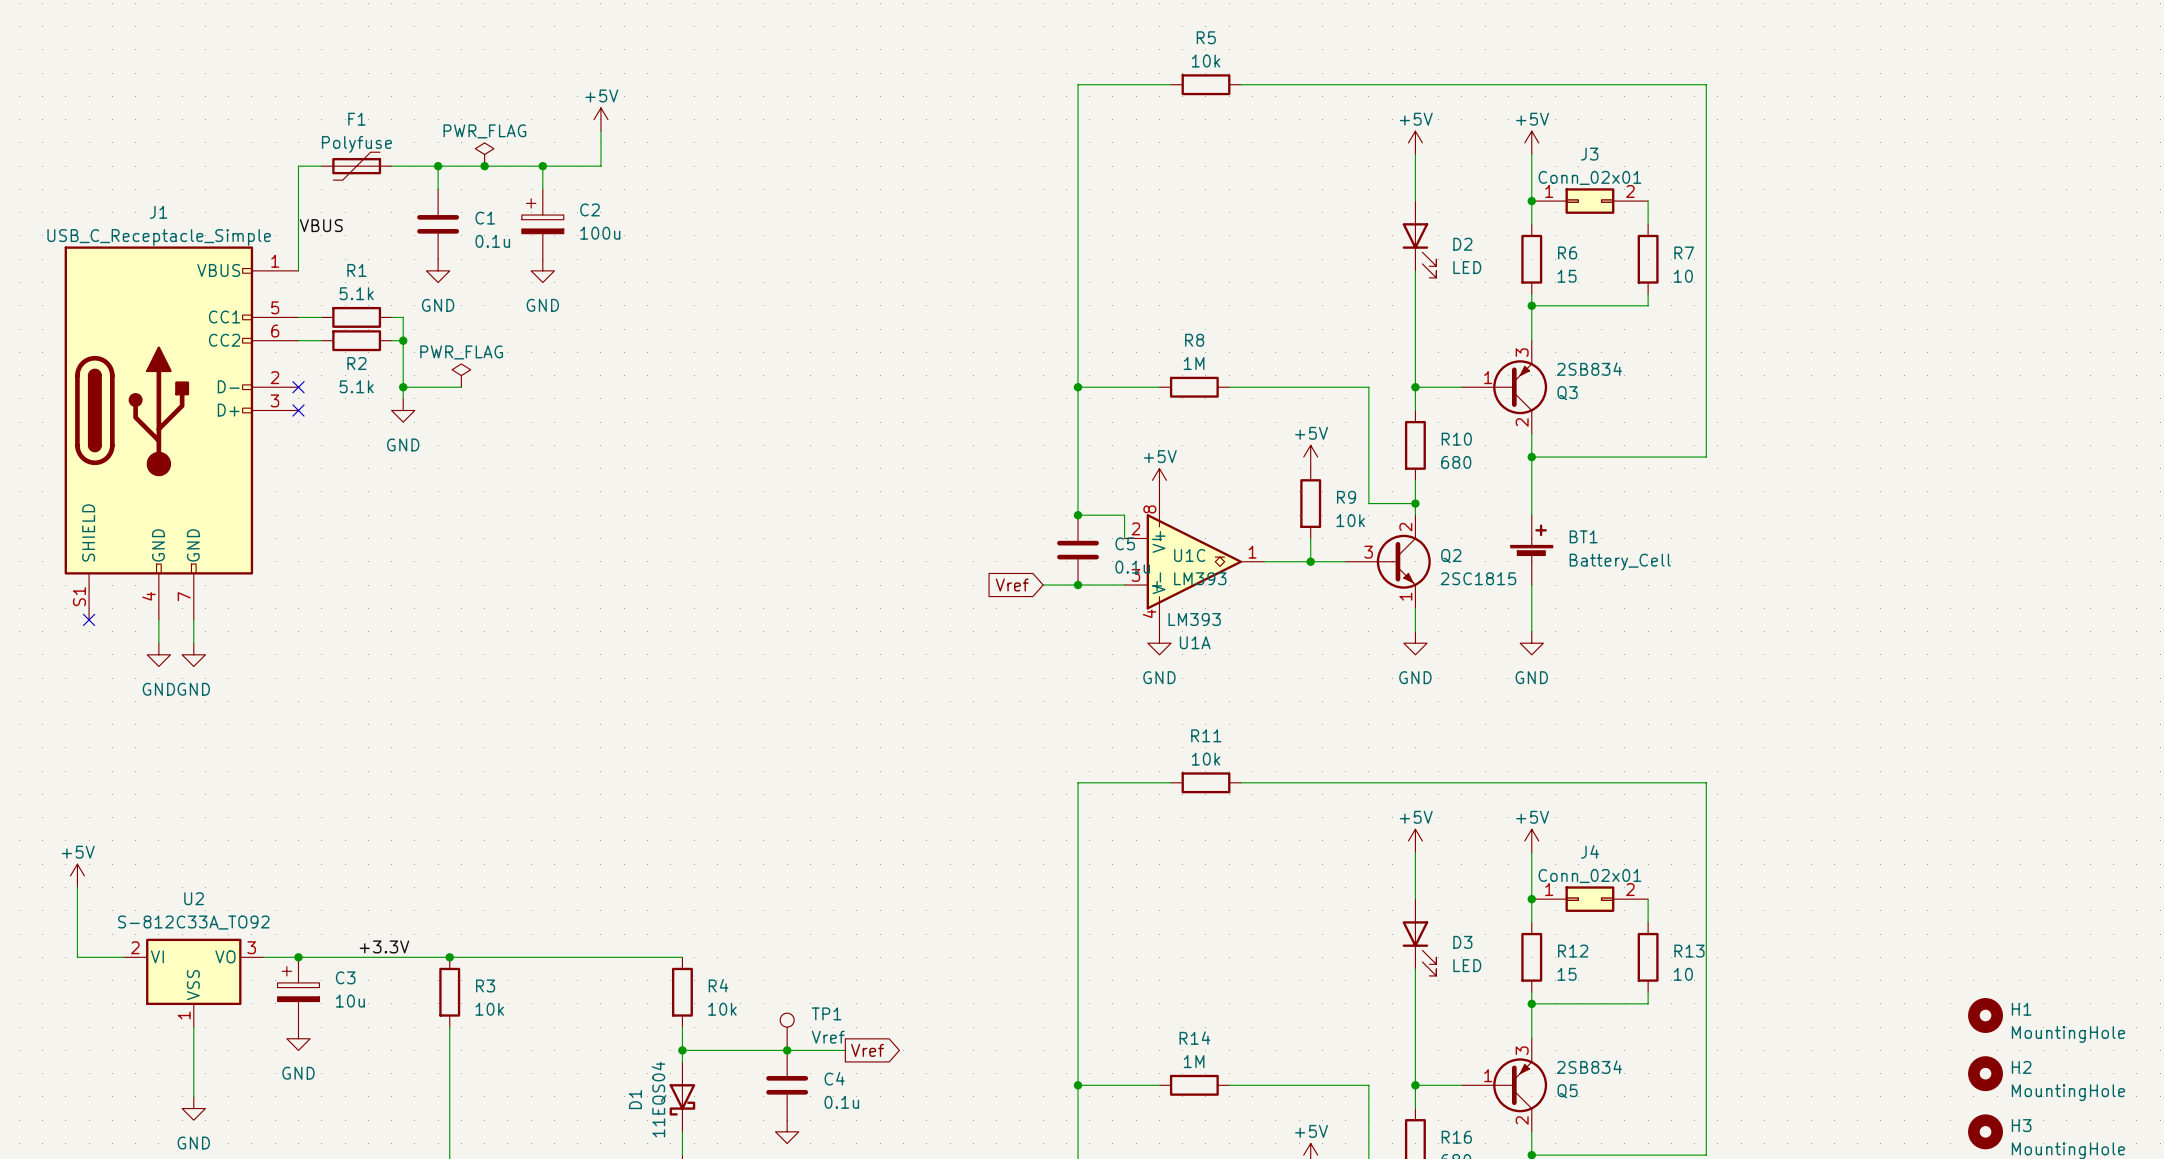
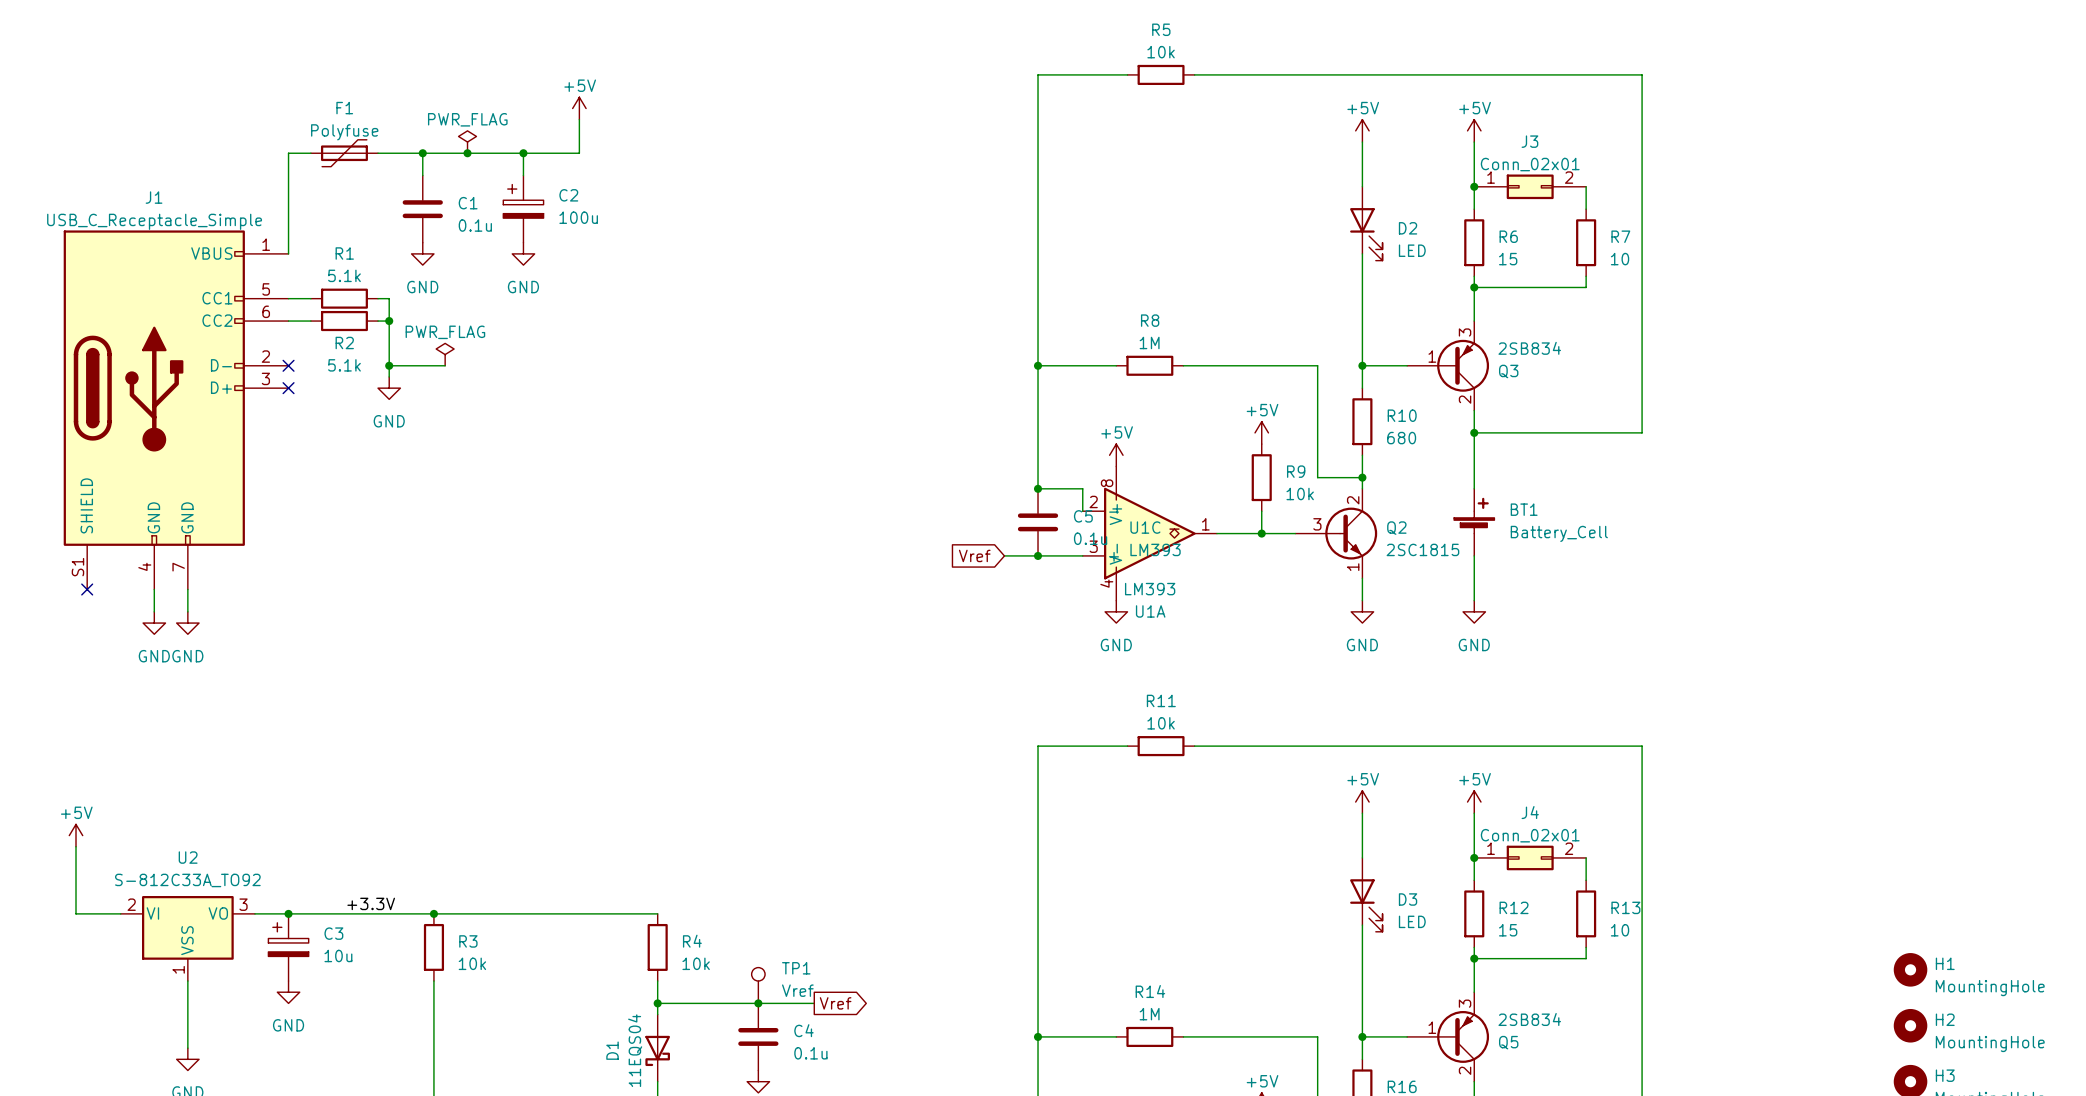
label: VBUS (321, 225) -> none

